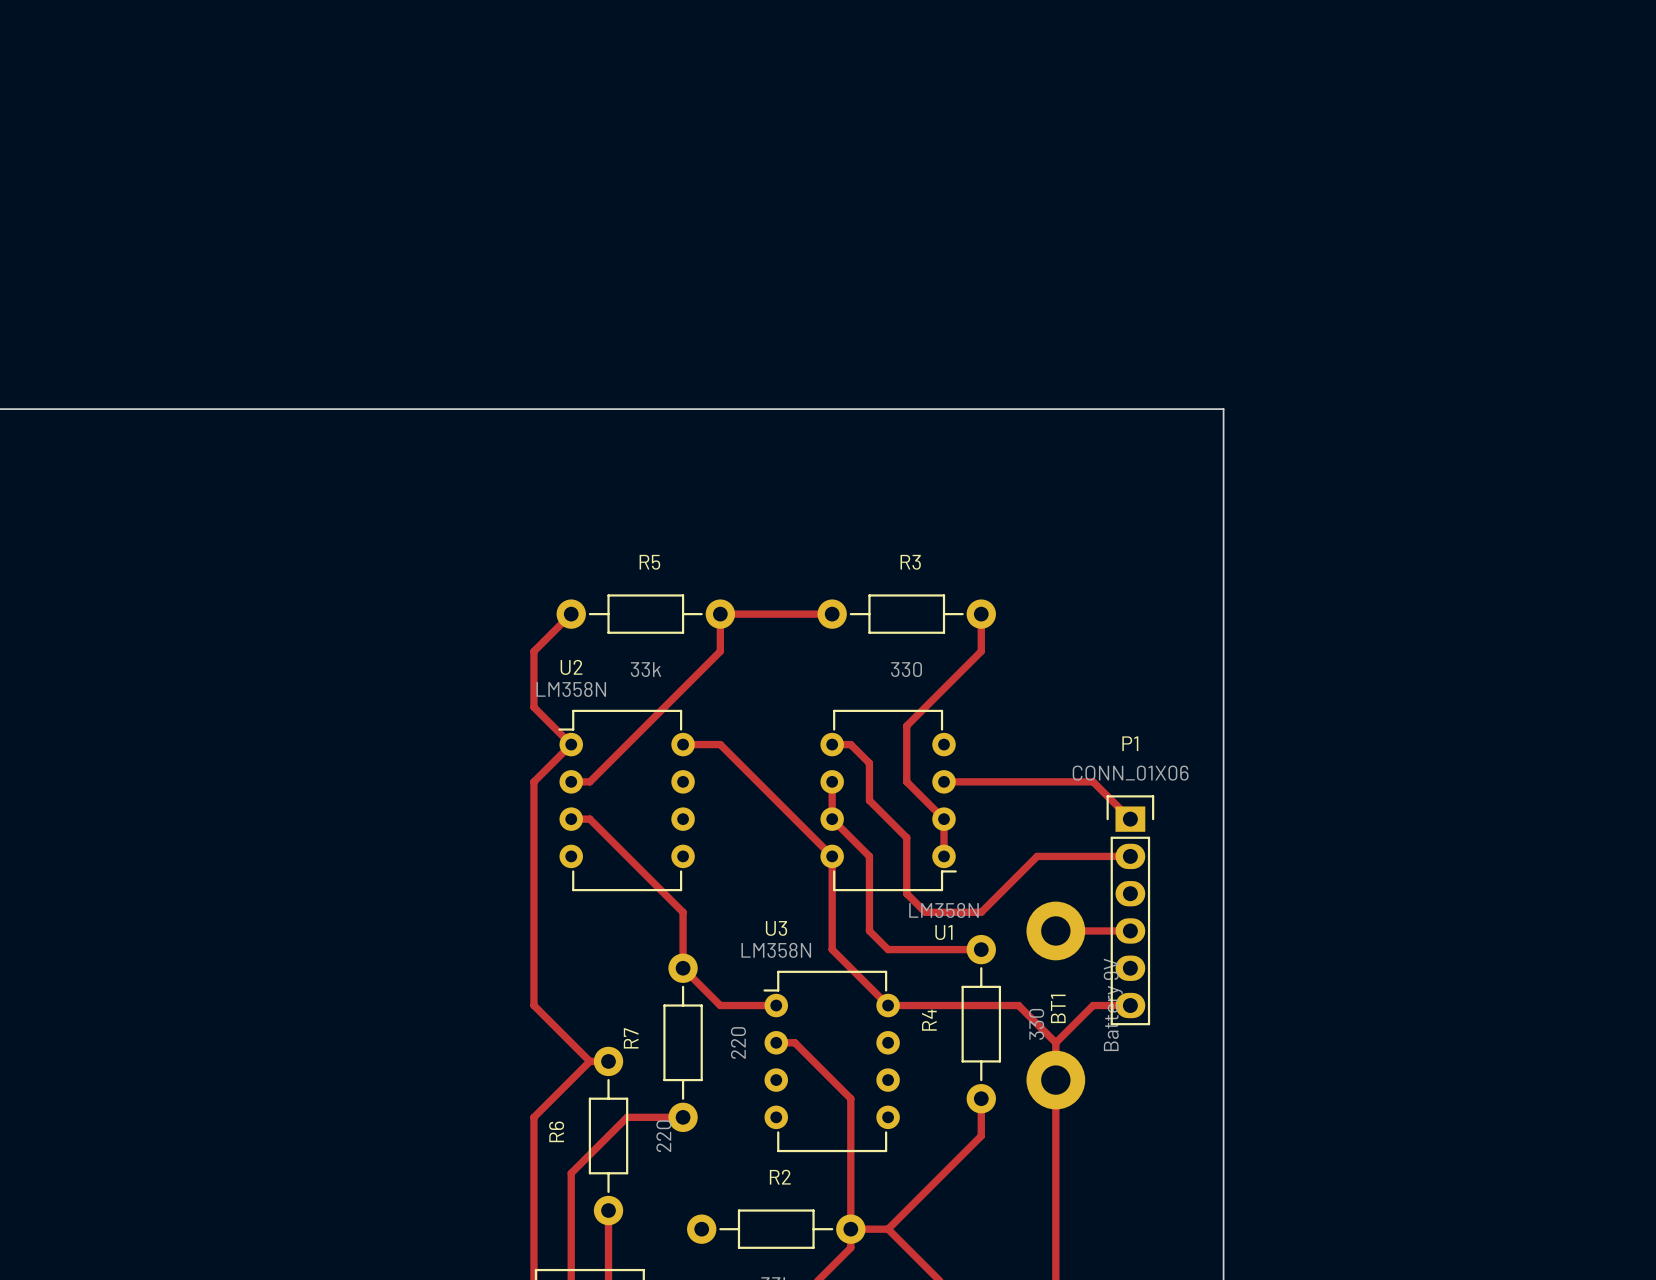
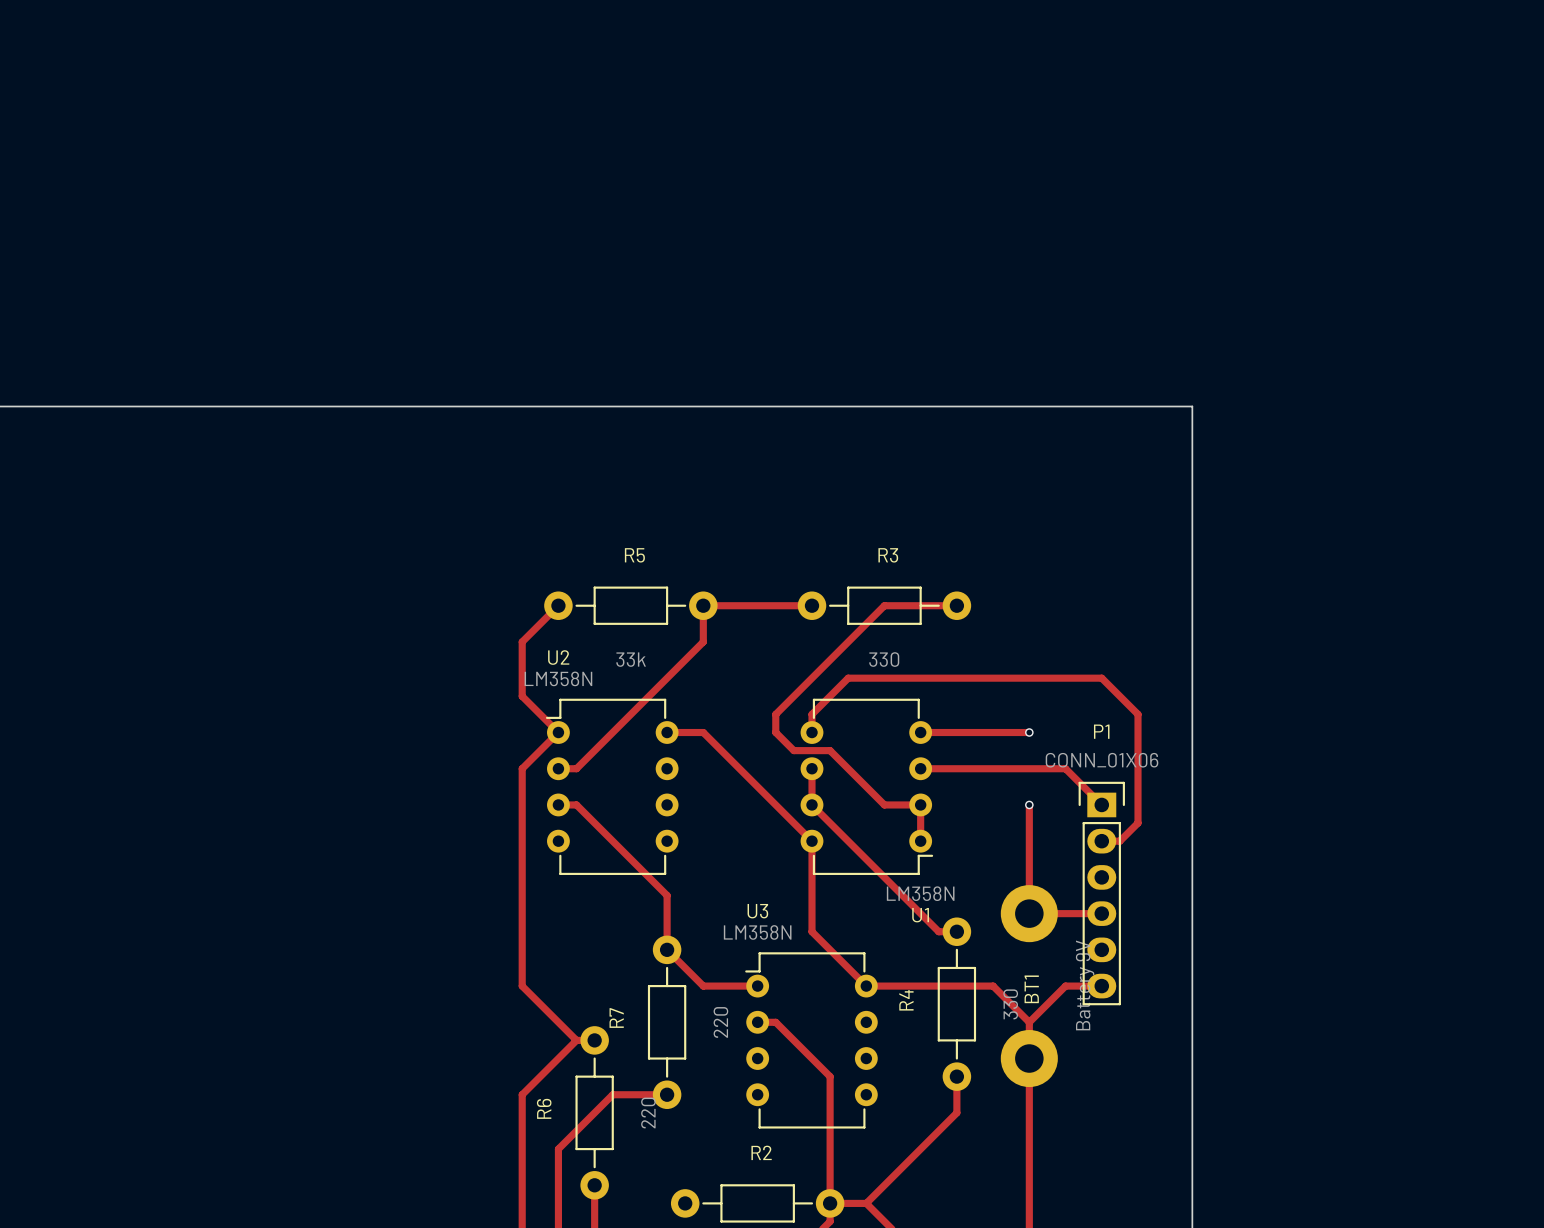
track: (981, 614) (981, 651) (906, 725) (906, 781) (944, 819) -> (956, 605) (884, 605) (775, 714) (775, 732) (793, 750) (830, 750) (884, 804) (920, 804)
track: (832, 744) (850, 744) (869, 763) (869, 800) (906, 837) (906, 893) -> none
track: none -> (920, 732) (1029, 732)
via: none -> (1029, 732)
track: none -> (1029, 804) (1029, 913)
via: none -> (1029, 804)
track: (869, 856) (869, 930) (888, 949) (962, 949) -> (848, 841) (884, 877)
track: (1130, 856) (1037, 856) (981, 912) (925, 912) -> (1101, 841) (1119, 841) (1138, 823) (1138, 714) (1101, 678) (848, 678) (811, 714) (811, 732)
track: none -> (902, 895) (938, 931)

